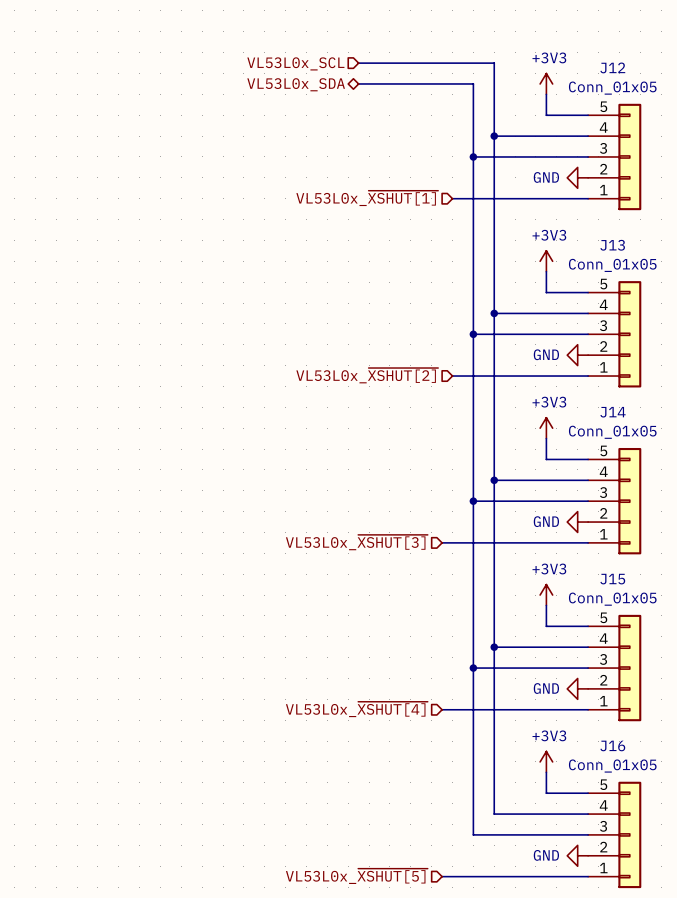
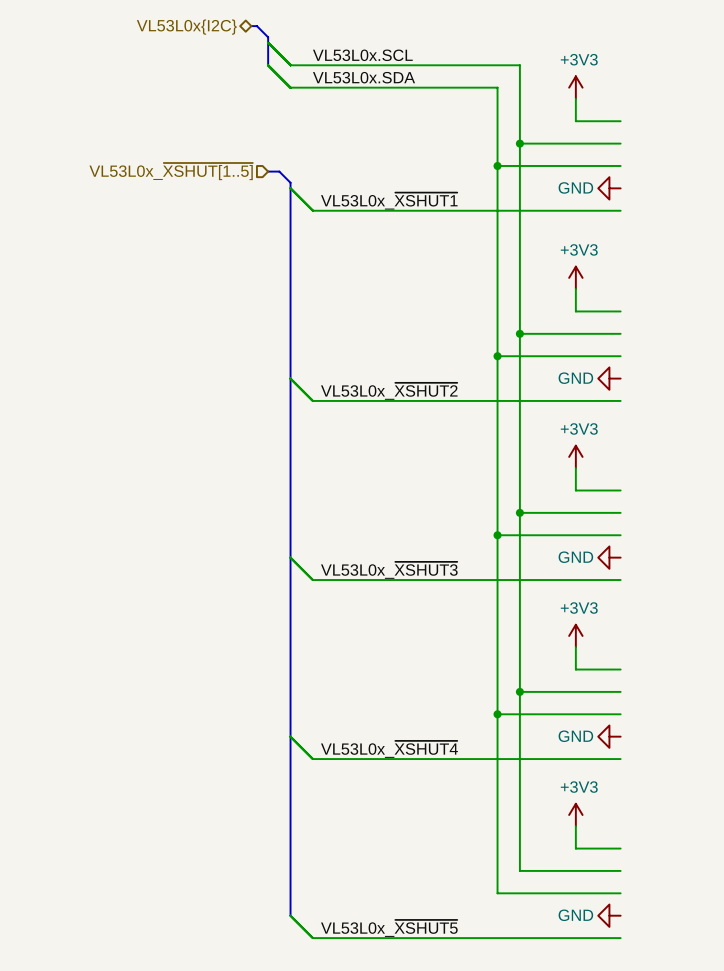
hierarchical label: none -> VL53L0x{I2C} (186, 27)
bus: none -> (251, 26) (256, 26) (268, 37) (268, 65)
wire: none -> (268, 42) (290, 65) (374, 65)
label: none -> VL53L0x.SCL (362, 55)
wire: none -> (268, 65) (290, 87) (374, 87)
hierarchical label: VL53L0x_SCL (295, 63) -> none
label: none -> VL53L0x.SDA (364, 77)
hierarchical label: VL53L0x_SDA (296, 84) -> none
J12: Conn_01x05 (614, 156) -> none
hierarchical label: none -> VL53L0x_~{XSHUT[1..5]} (171, 171)
bus: none -> (268, 171) (279, 171) (290, 182) (290, 915)
wire: none -> (290, 188) (312, 210) (475, 210)
label: none -> VL53L0x_~{XSHUT1} (389, 201)
hierarchical label: VL53L0x_~{XSHUT[1]} (367, 198) -> none
J13: Conn_01x05 (614, 334) -> none
wire: none -> (290, 378) (312, 400) (475, 400)
label: none -> VL53L0x_~{XSHUT2} (389, 391)
hierarchical label: VL53L0x_~{XSHUT[2]} (367, 375) -> none
J14: Conn_01x05 (614, 501) -> none
wire: none -> (290, 557) (312, 580) (463, 580)
label: none -> VL53L0x_~{XSHUT3} (389, 570)
hierarchical label: VL53L0x_~{XSHUT[3]} (356, 542) -> none
J15: Conn_01x05 (614, 668) -> none
wire: none -> (290, 736) (312, 759) (463, 759)
label: none -> VL53L0x_~{XSHUT4} (389, 749)
hierarchical label: VL53L0x_~{XSHUT[4]} (356, 709) -> none
J16: Conn_01x05 (614, 834) -> none
wire: none -> (290, 915) (312, 938) (463, 938)
label: none -> VL53L0x_~{XSHUT5} (389, 928)
hierarchical label: VL53L0x_~{XSHUT[5]} (356, 876) -> none

